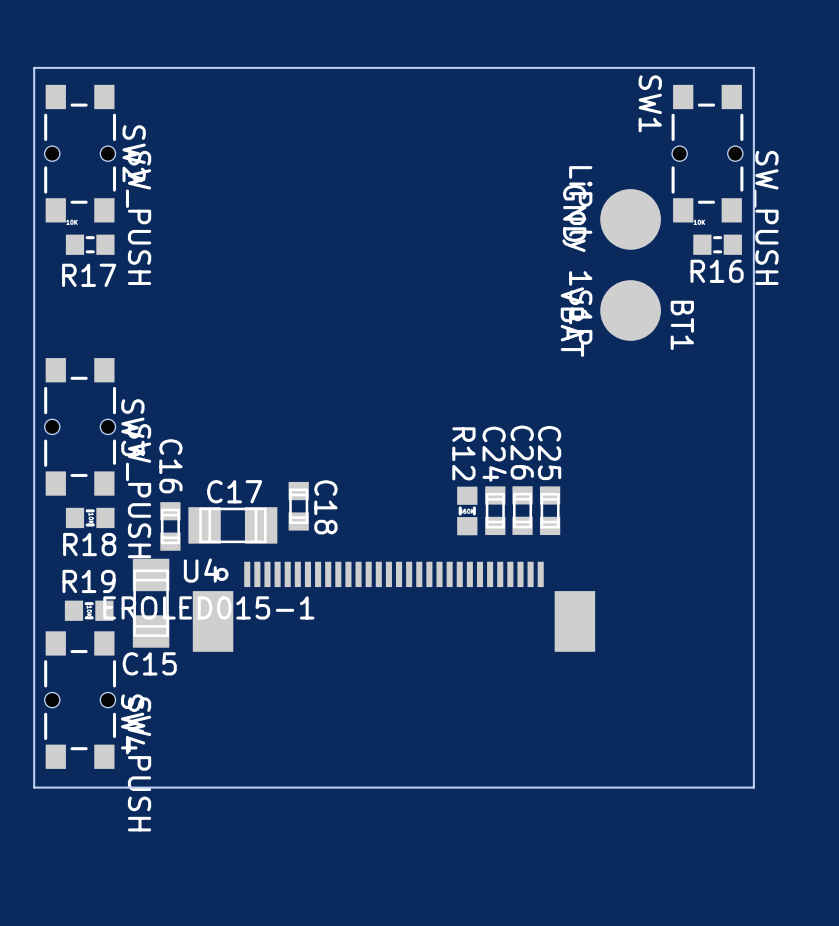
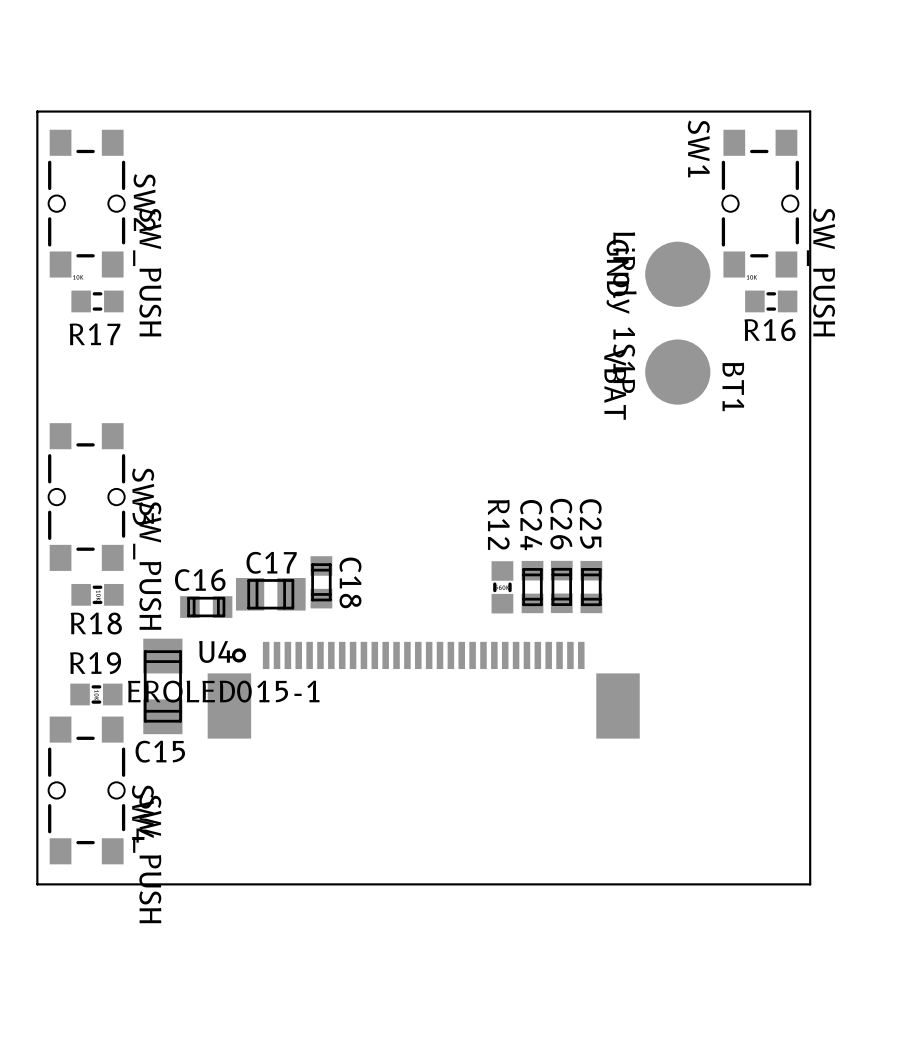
C17 footprint: [188, 507, 278, 544] -> [235, 578, 306, 611]
C16 rotation: 0° (170, 526) -> 90° clockwise (206, 607)

